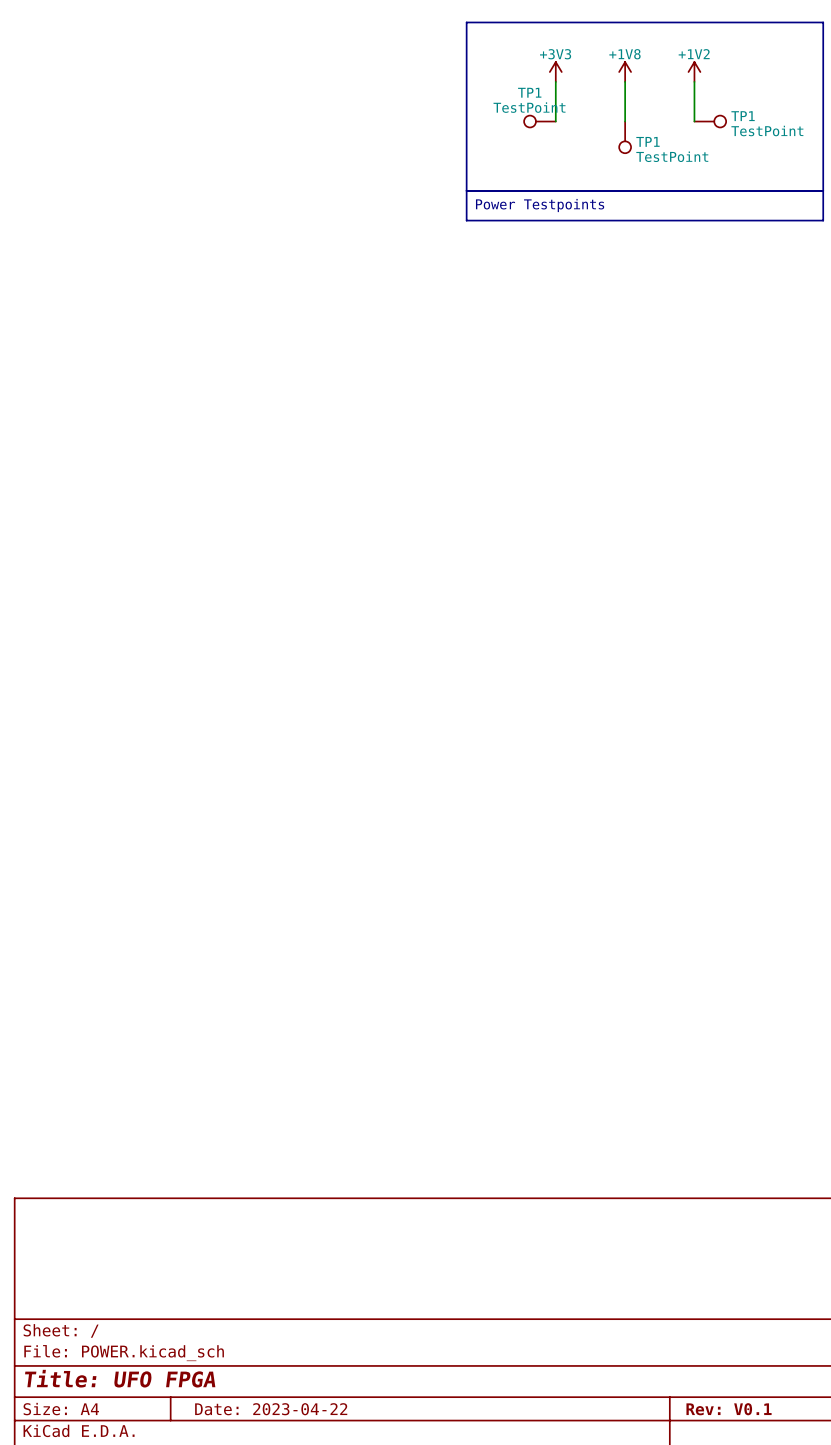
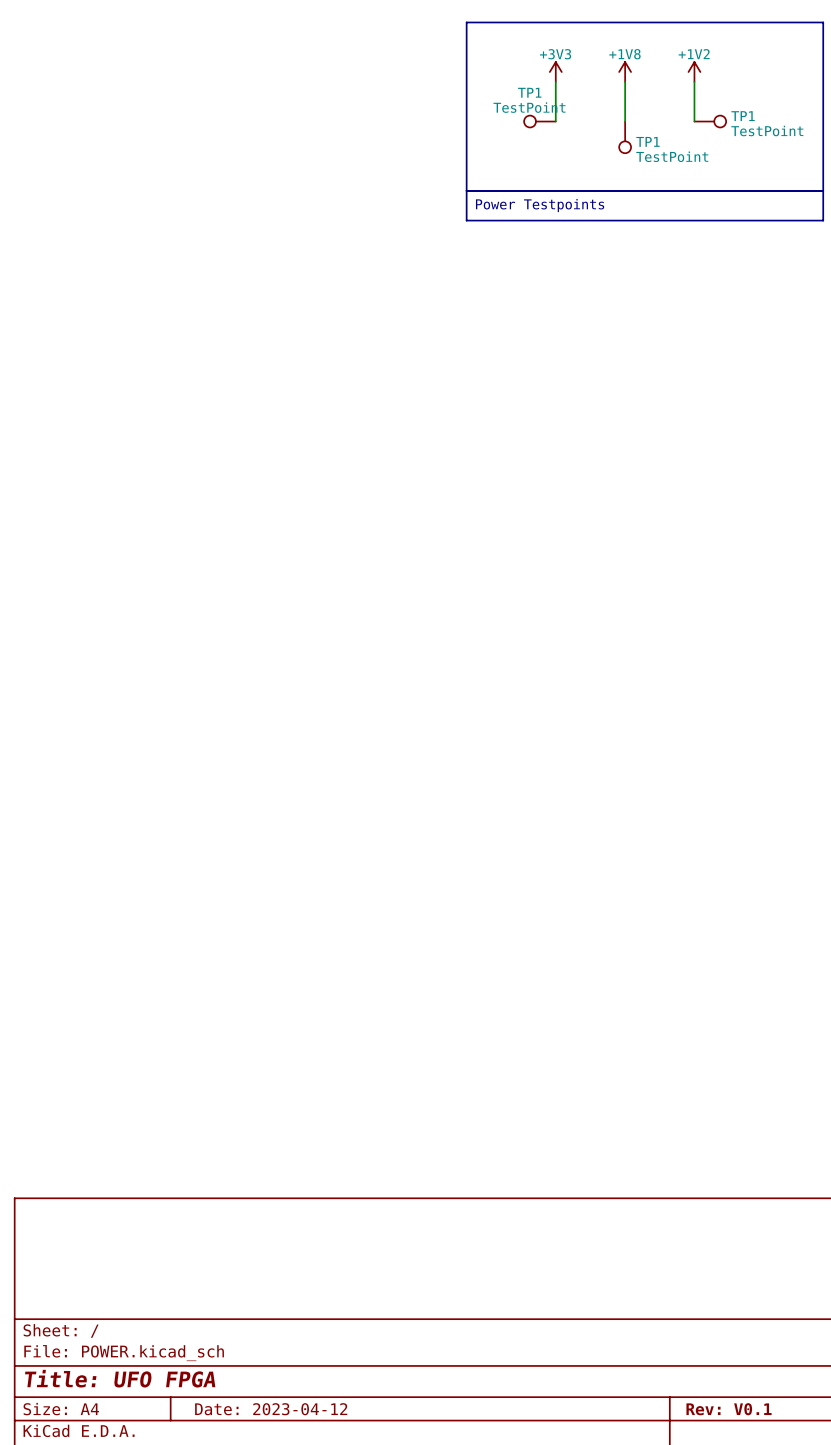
title block: Date: 2023-04-22 (271, 1409) -> Date: 2023-04-12 (271, 1409)

